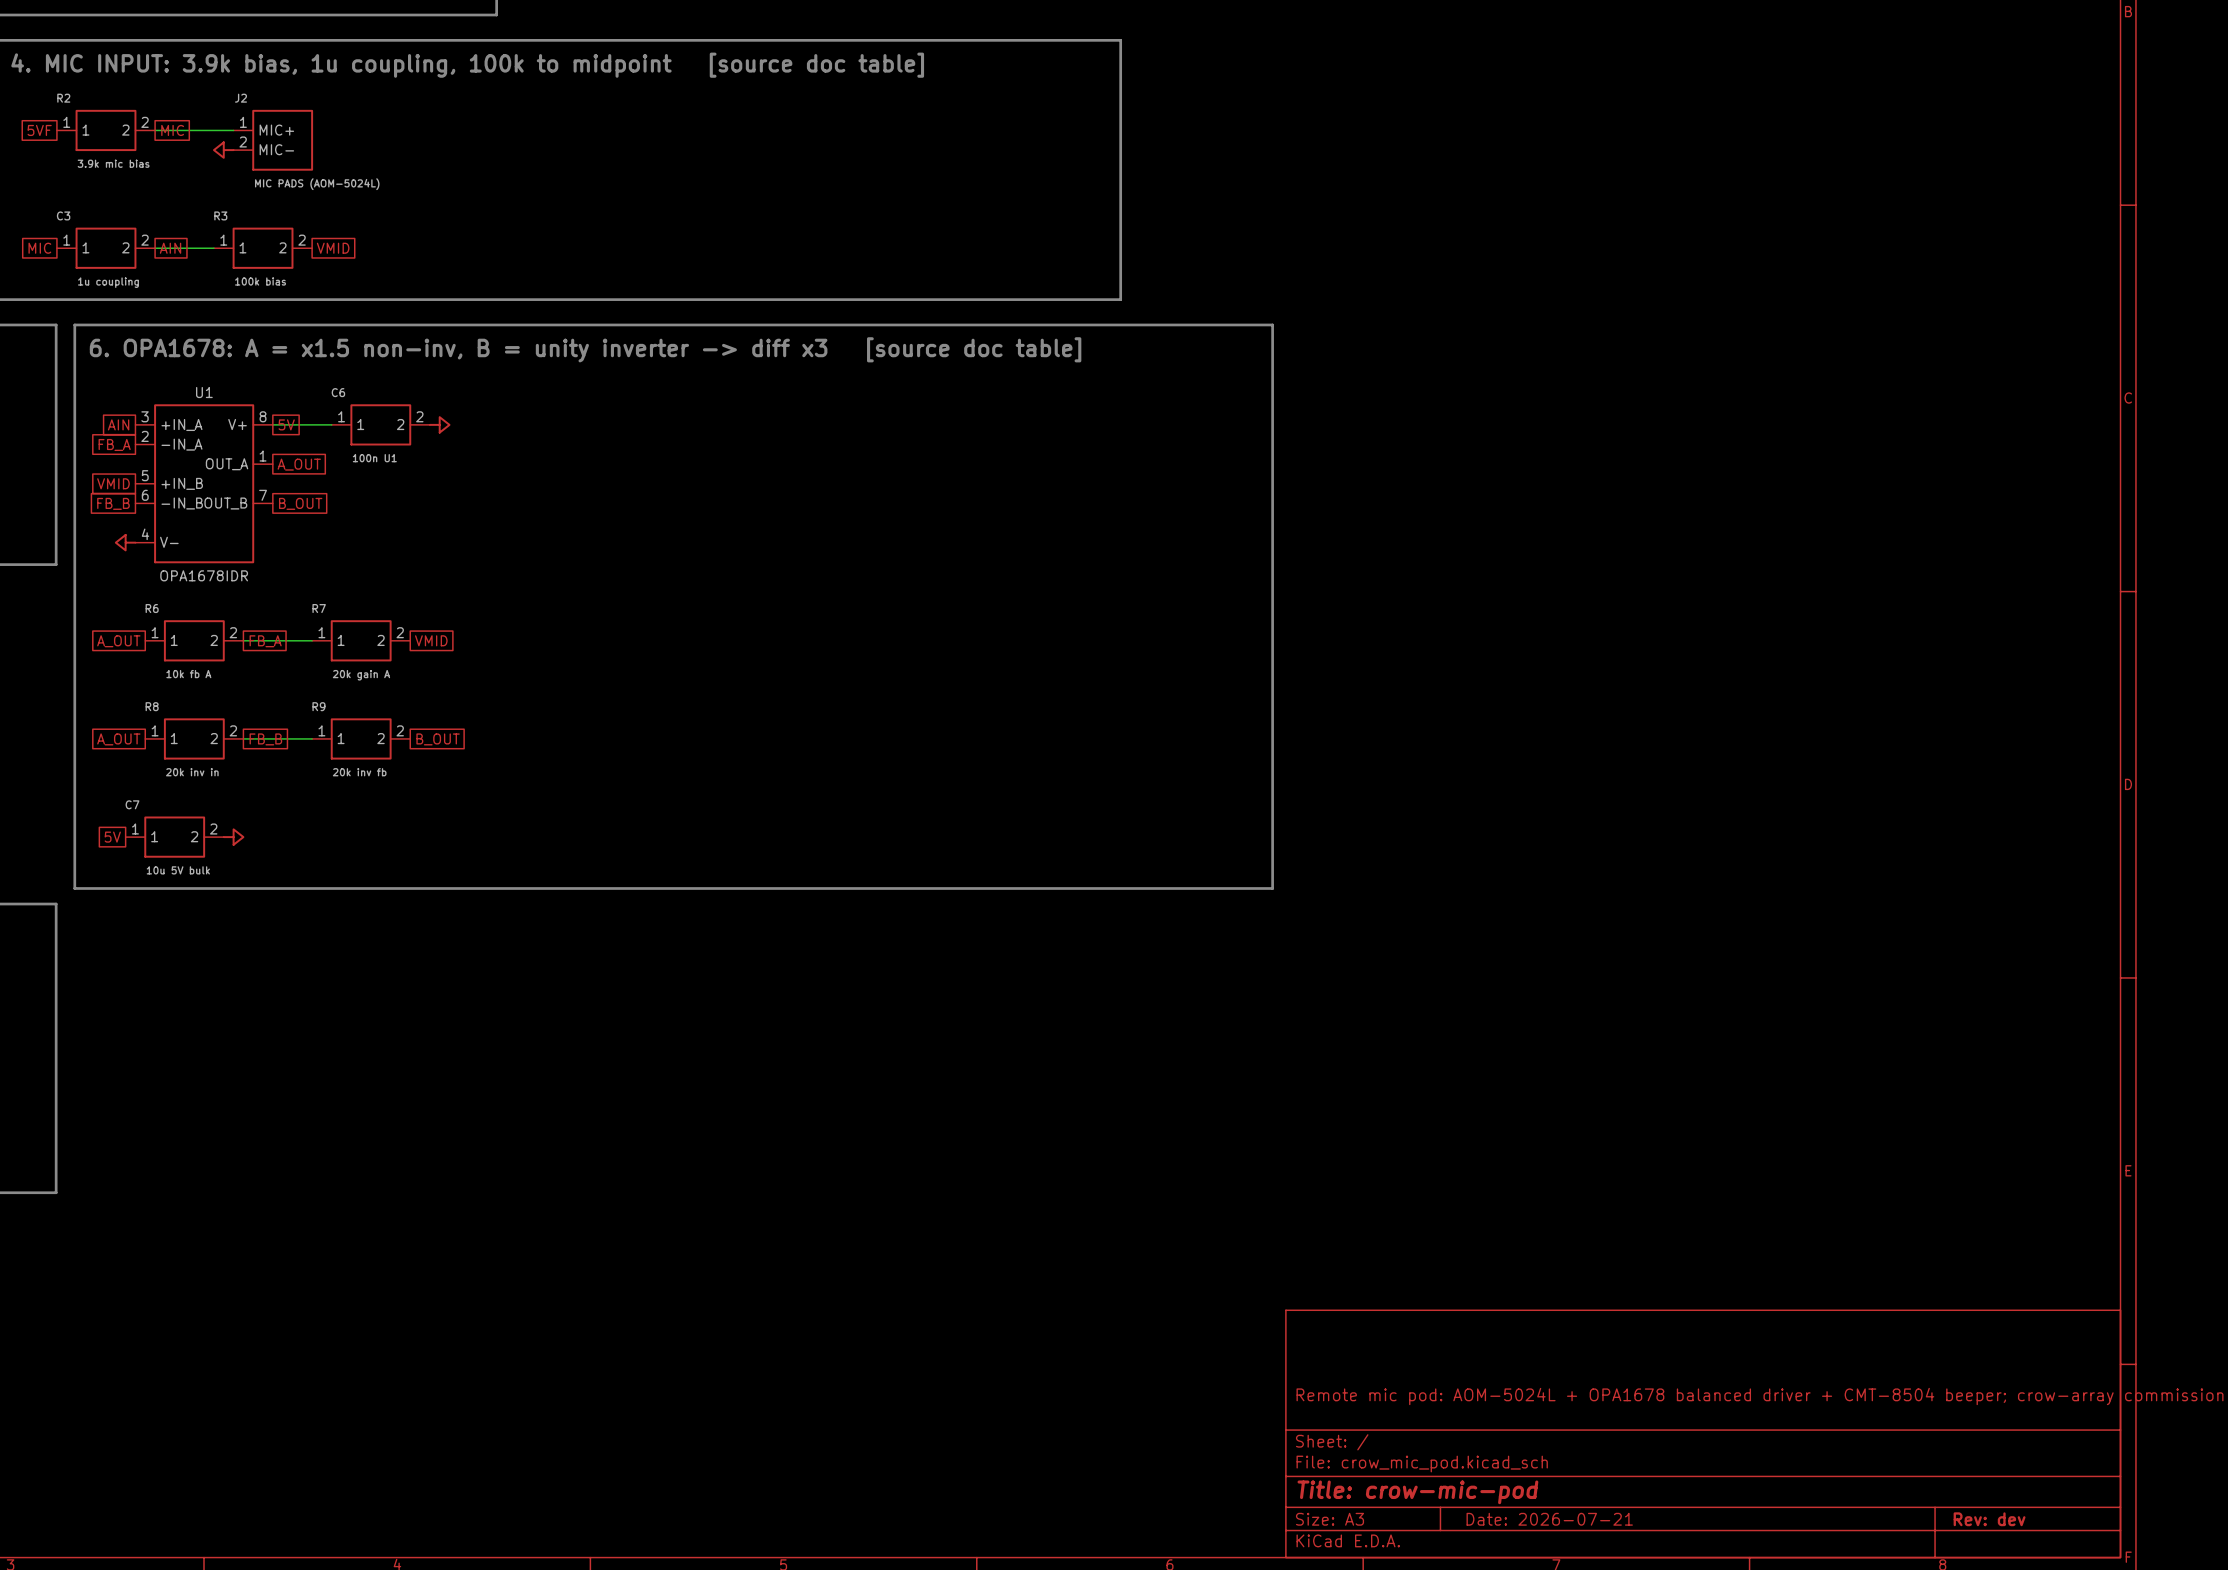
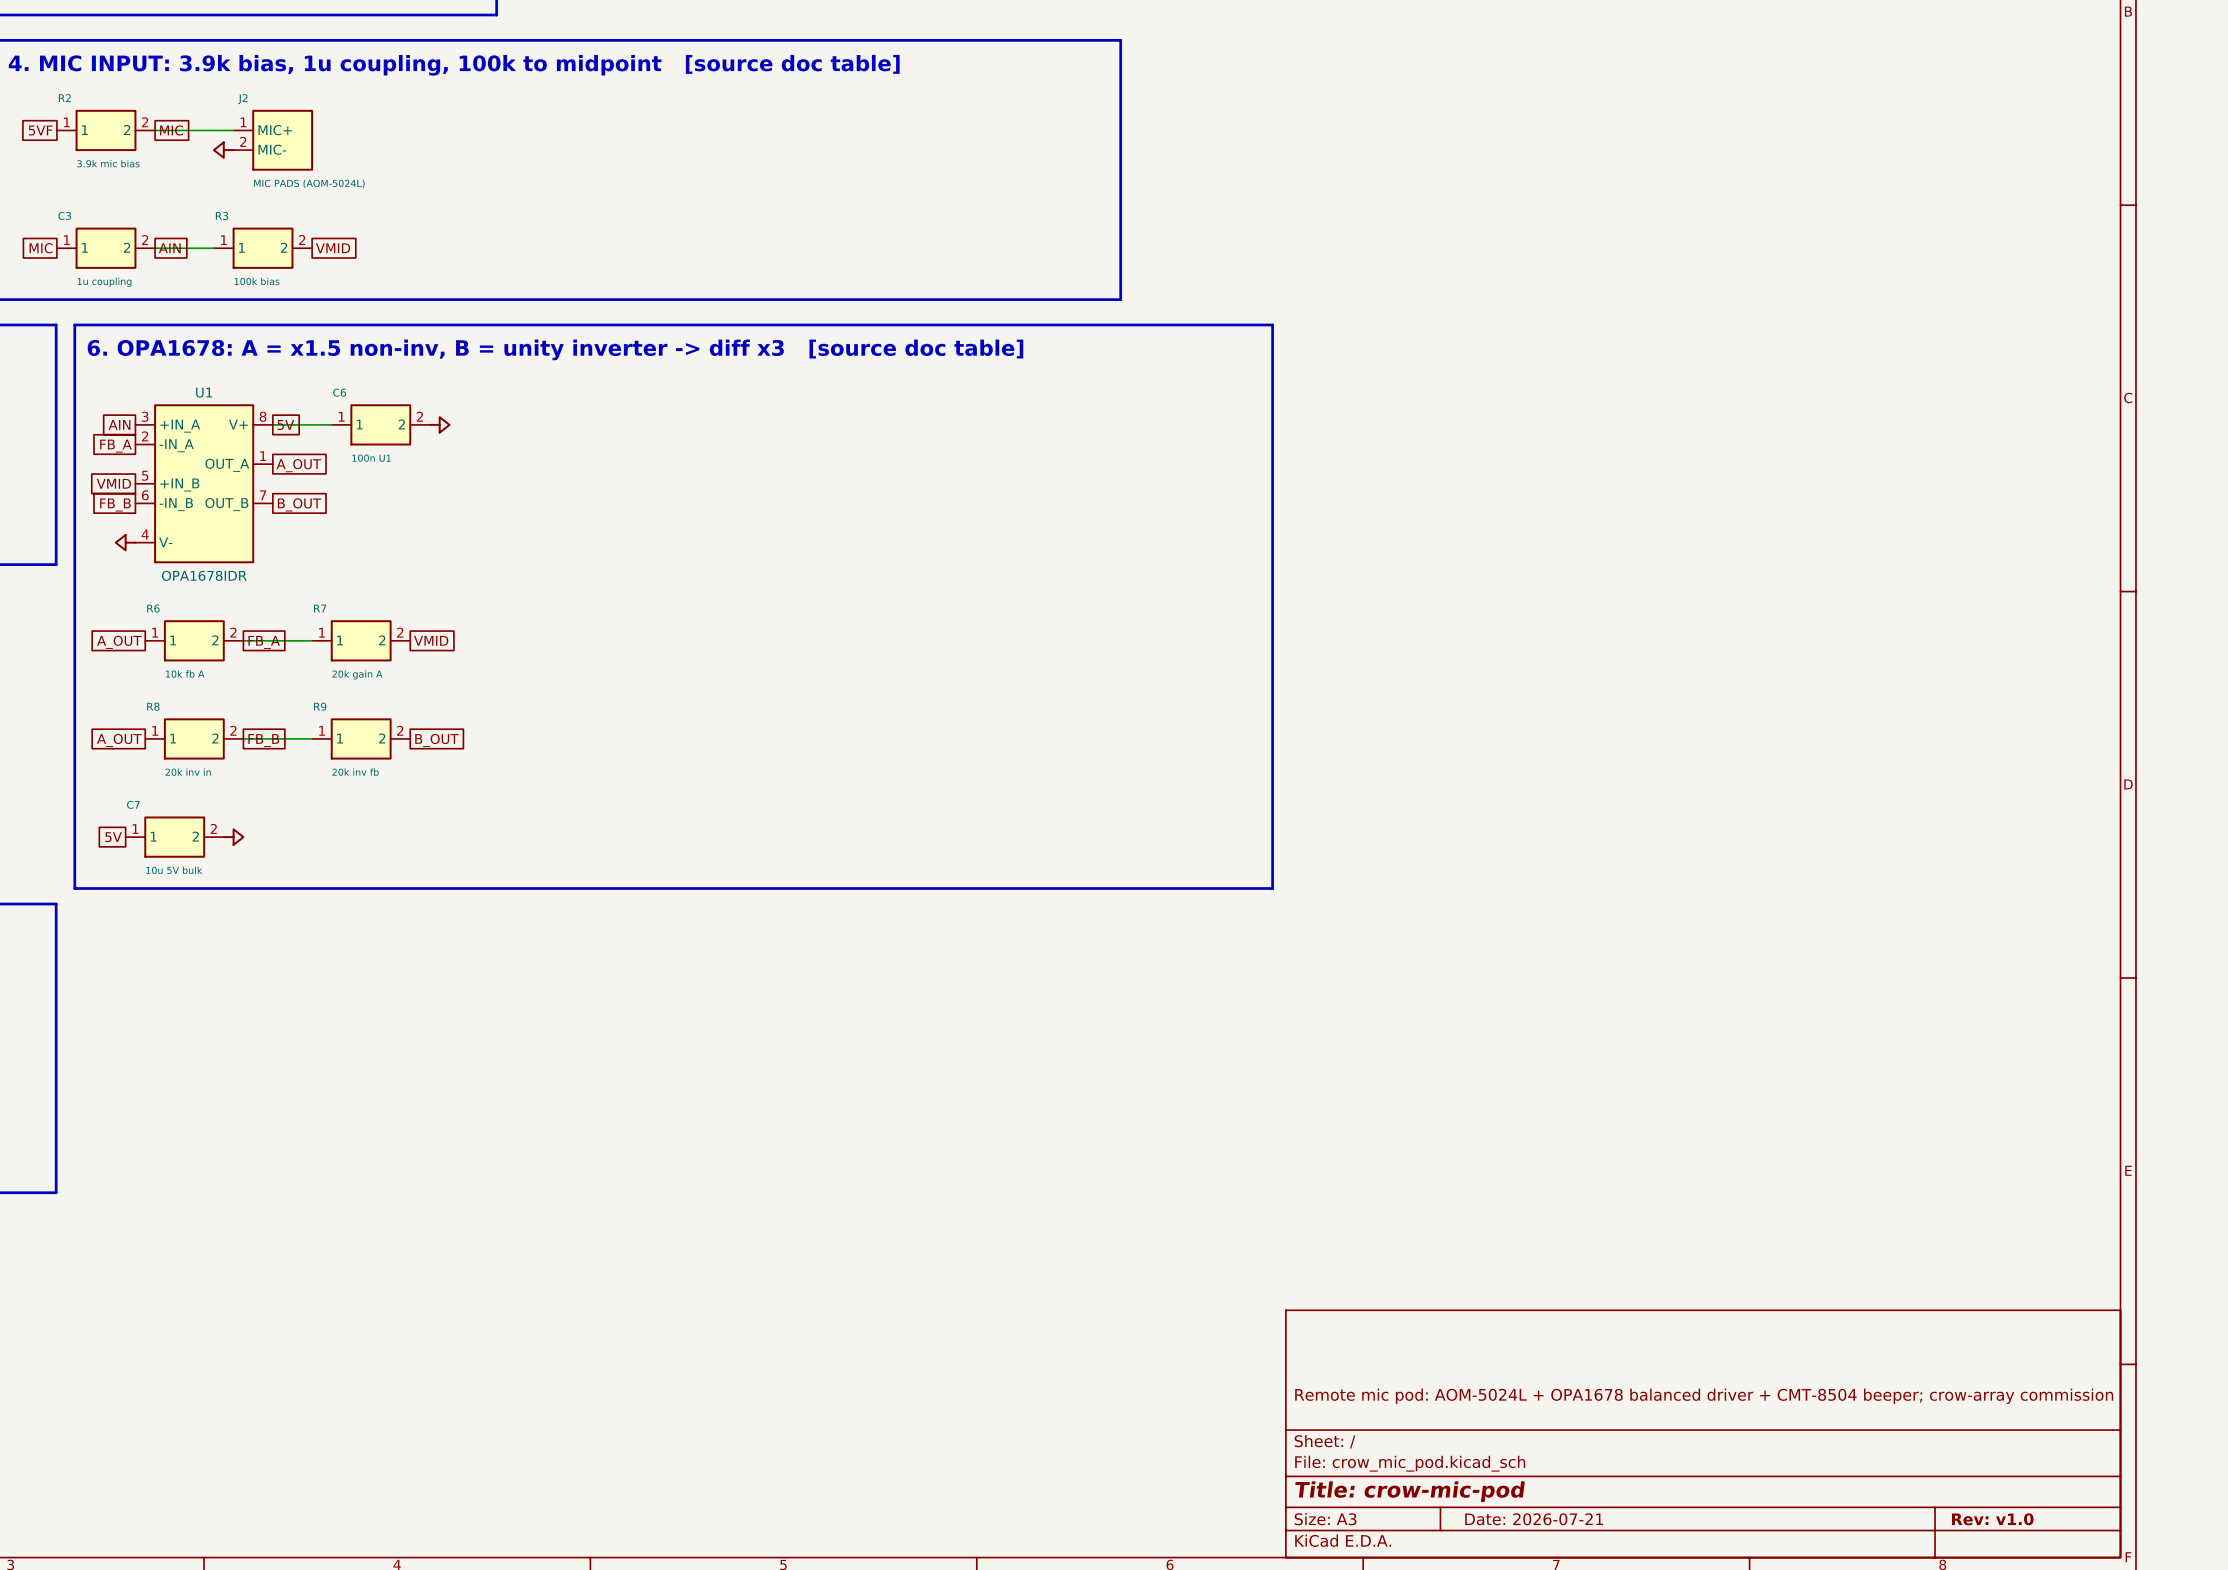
title block: Rev: dev (1989, 1519) -> Rev: v1.0 (1992, 1519)

